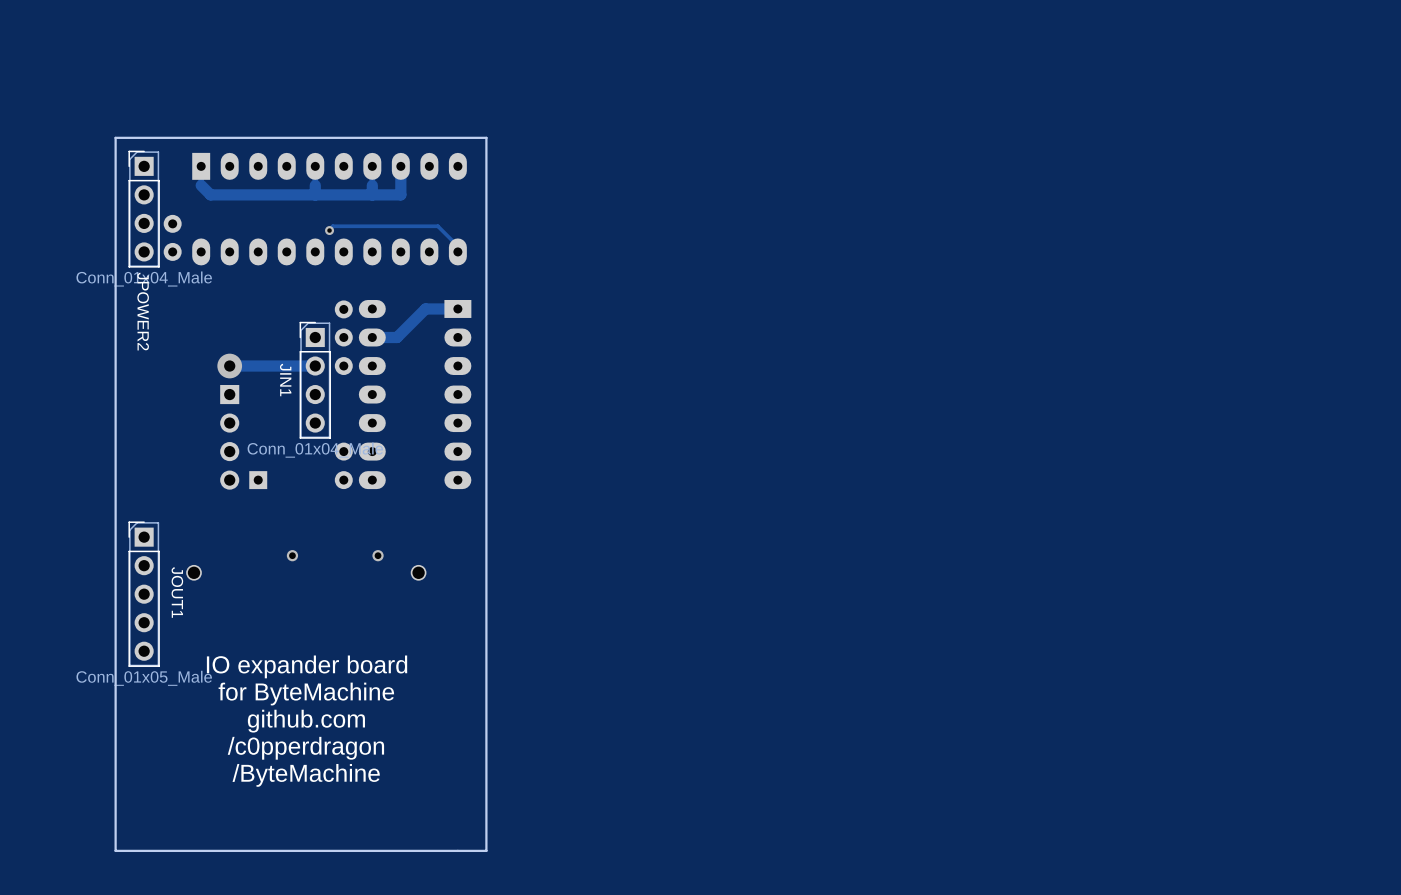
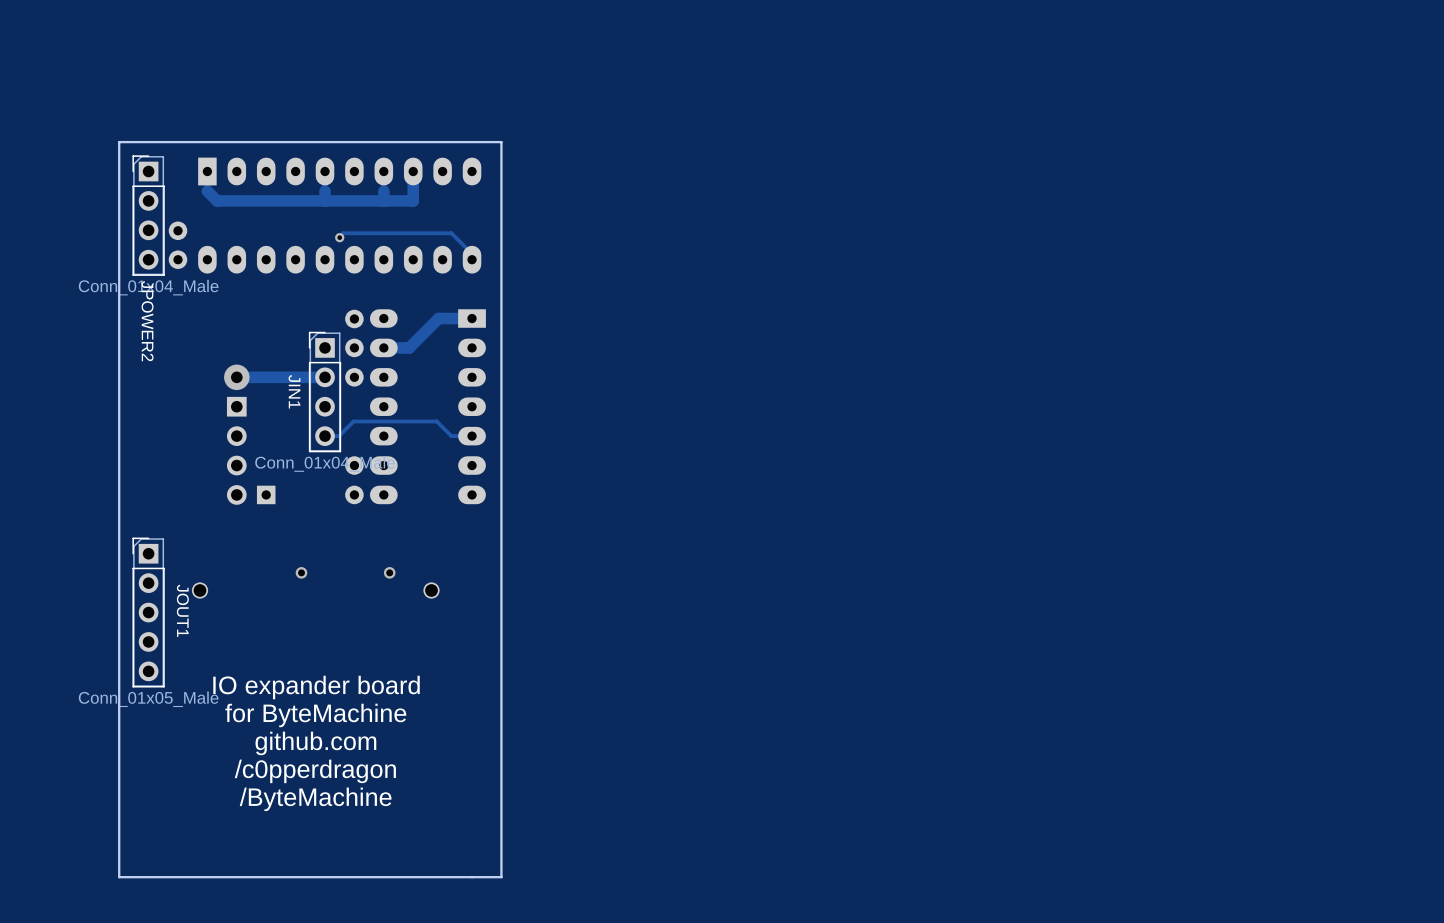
track: none -> (472, 436) (451, 436) (436, 421) (353, 421) (338, 436) (325, 436)

